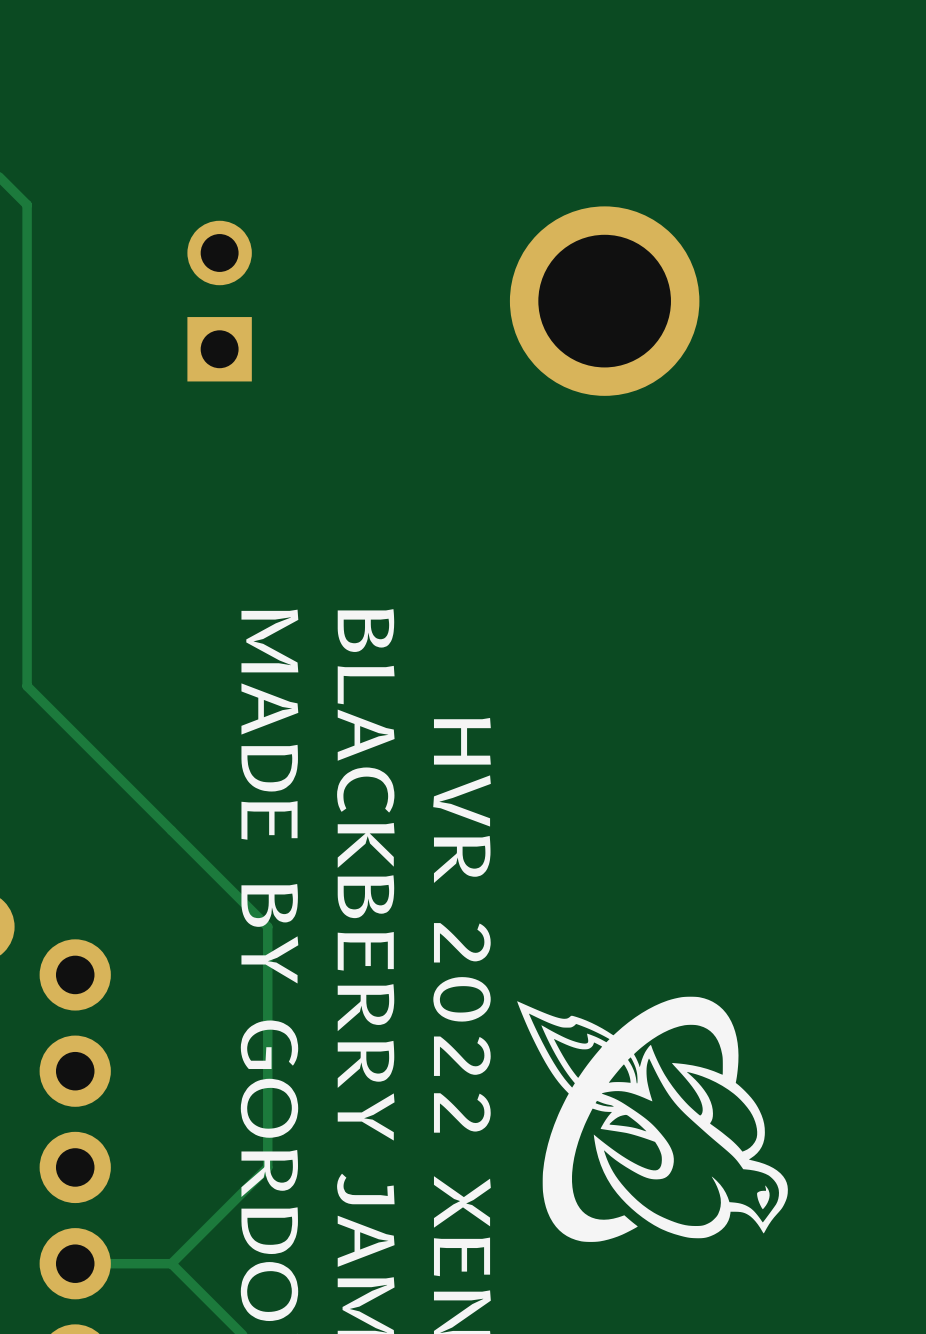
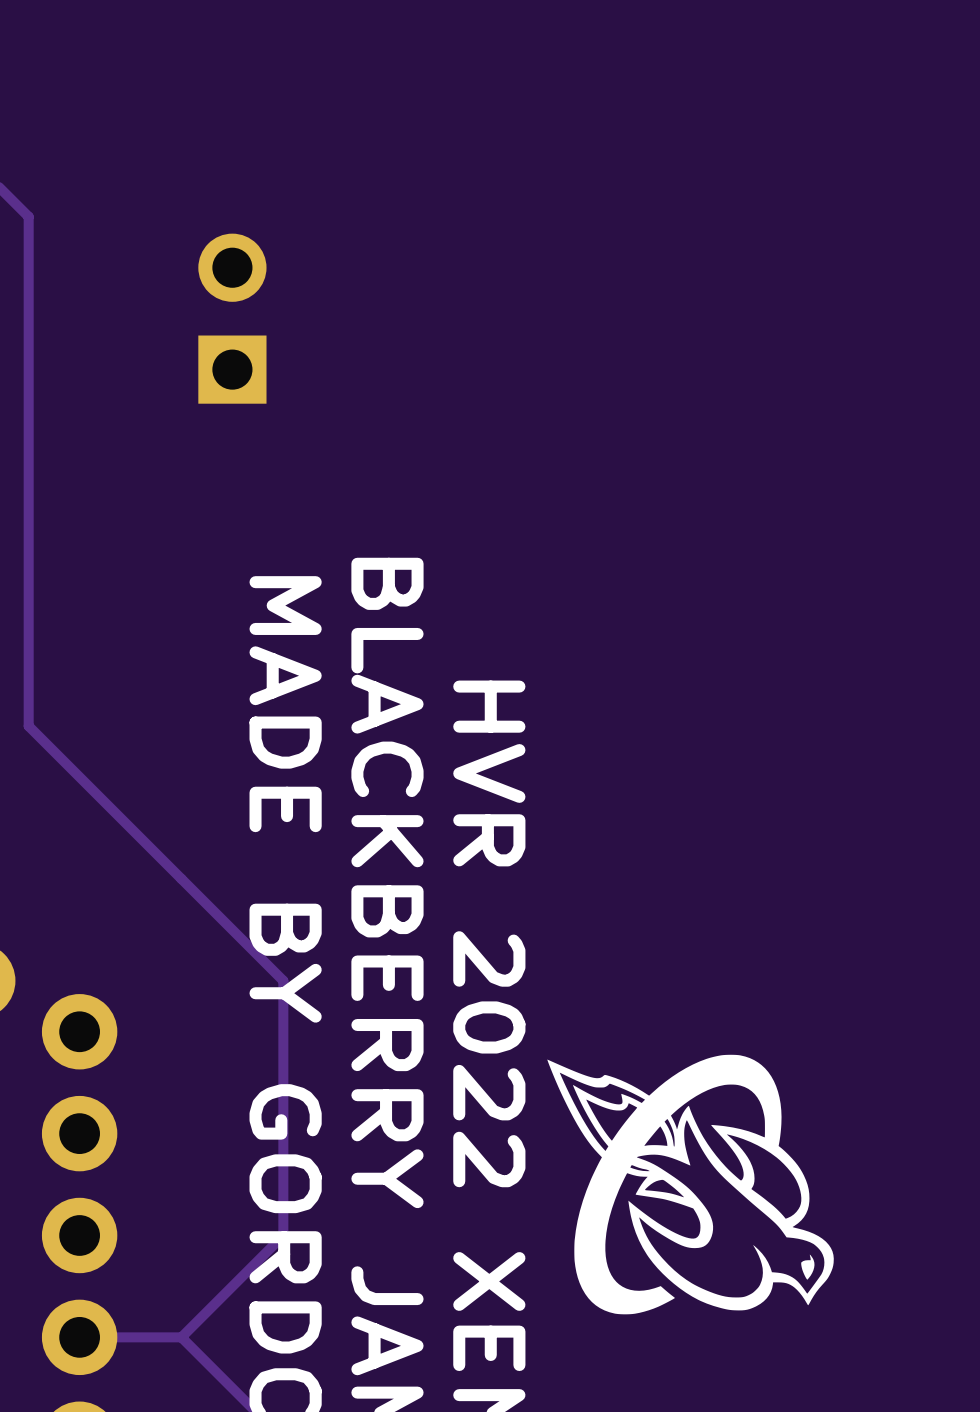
part: (604, 301) -> none

